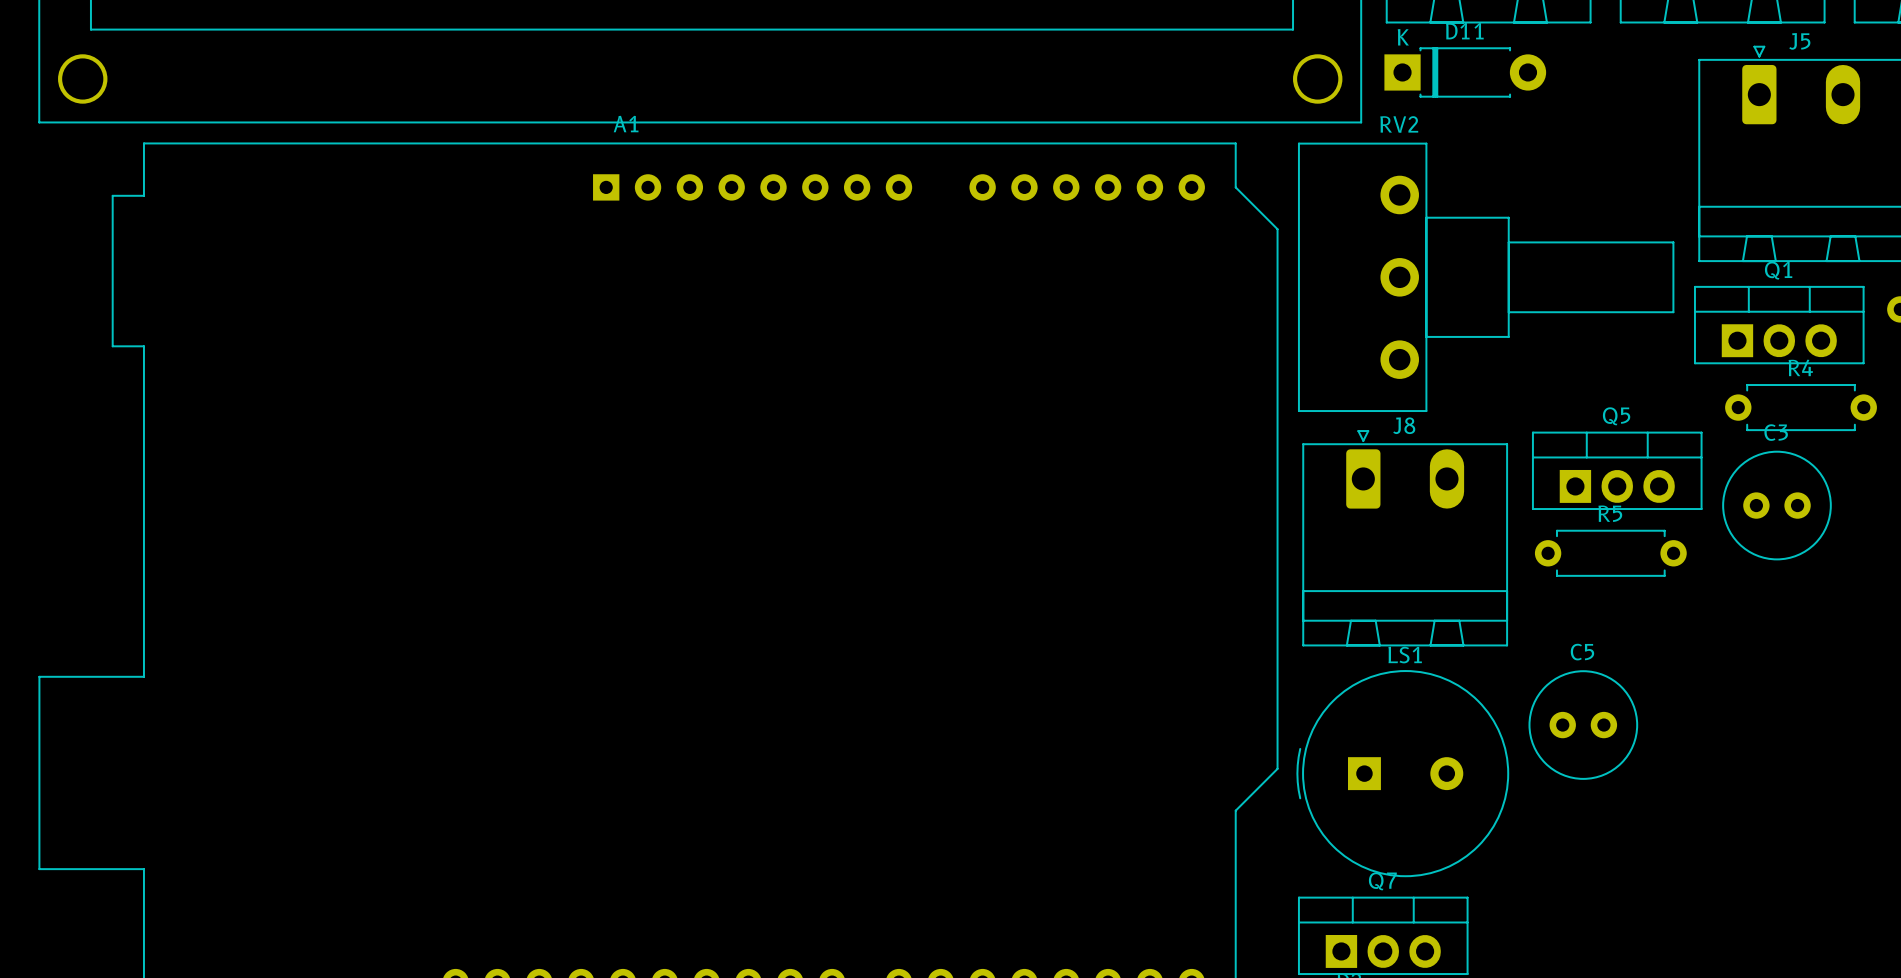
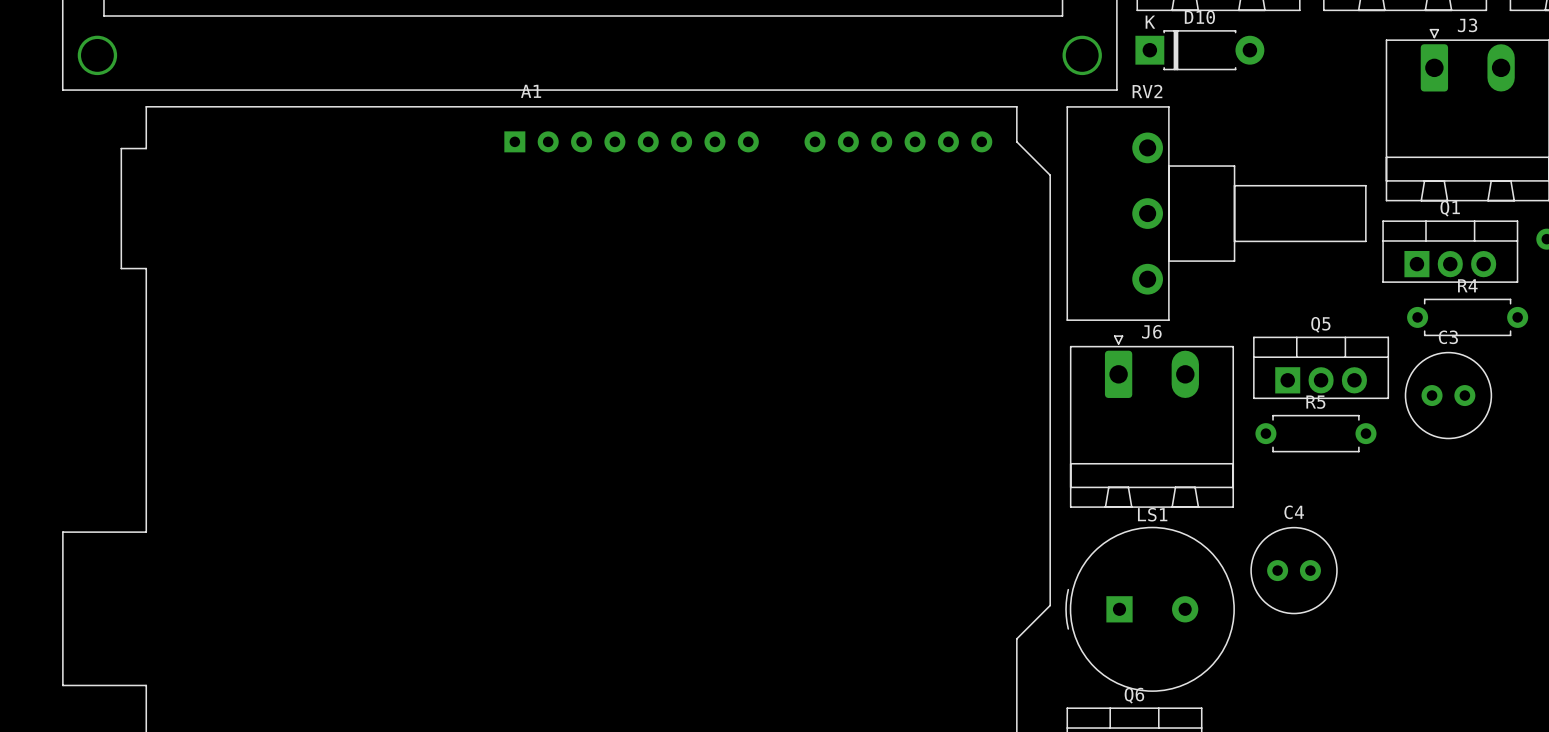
D11 name: D11 (1464, 31) -> D10 (1199, 17)
J5 name: J5 (1799, 41) -> J3 (1467, 25)
J8 name: J8 (1404, 425) -> J6 (1151, 331)
C5 name: C5 (1582, 652) -> C4 (1294, 512)
Q7 name: Q7 (1382, 881) -> Q6 (1134, 695)

